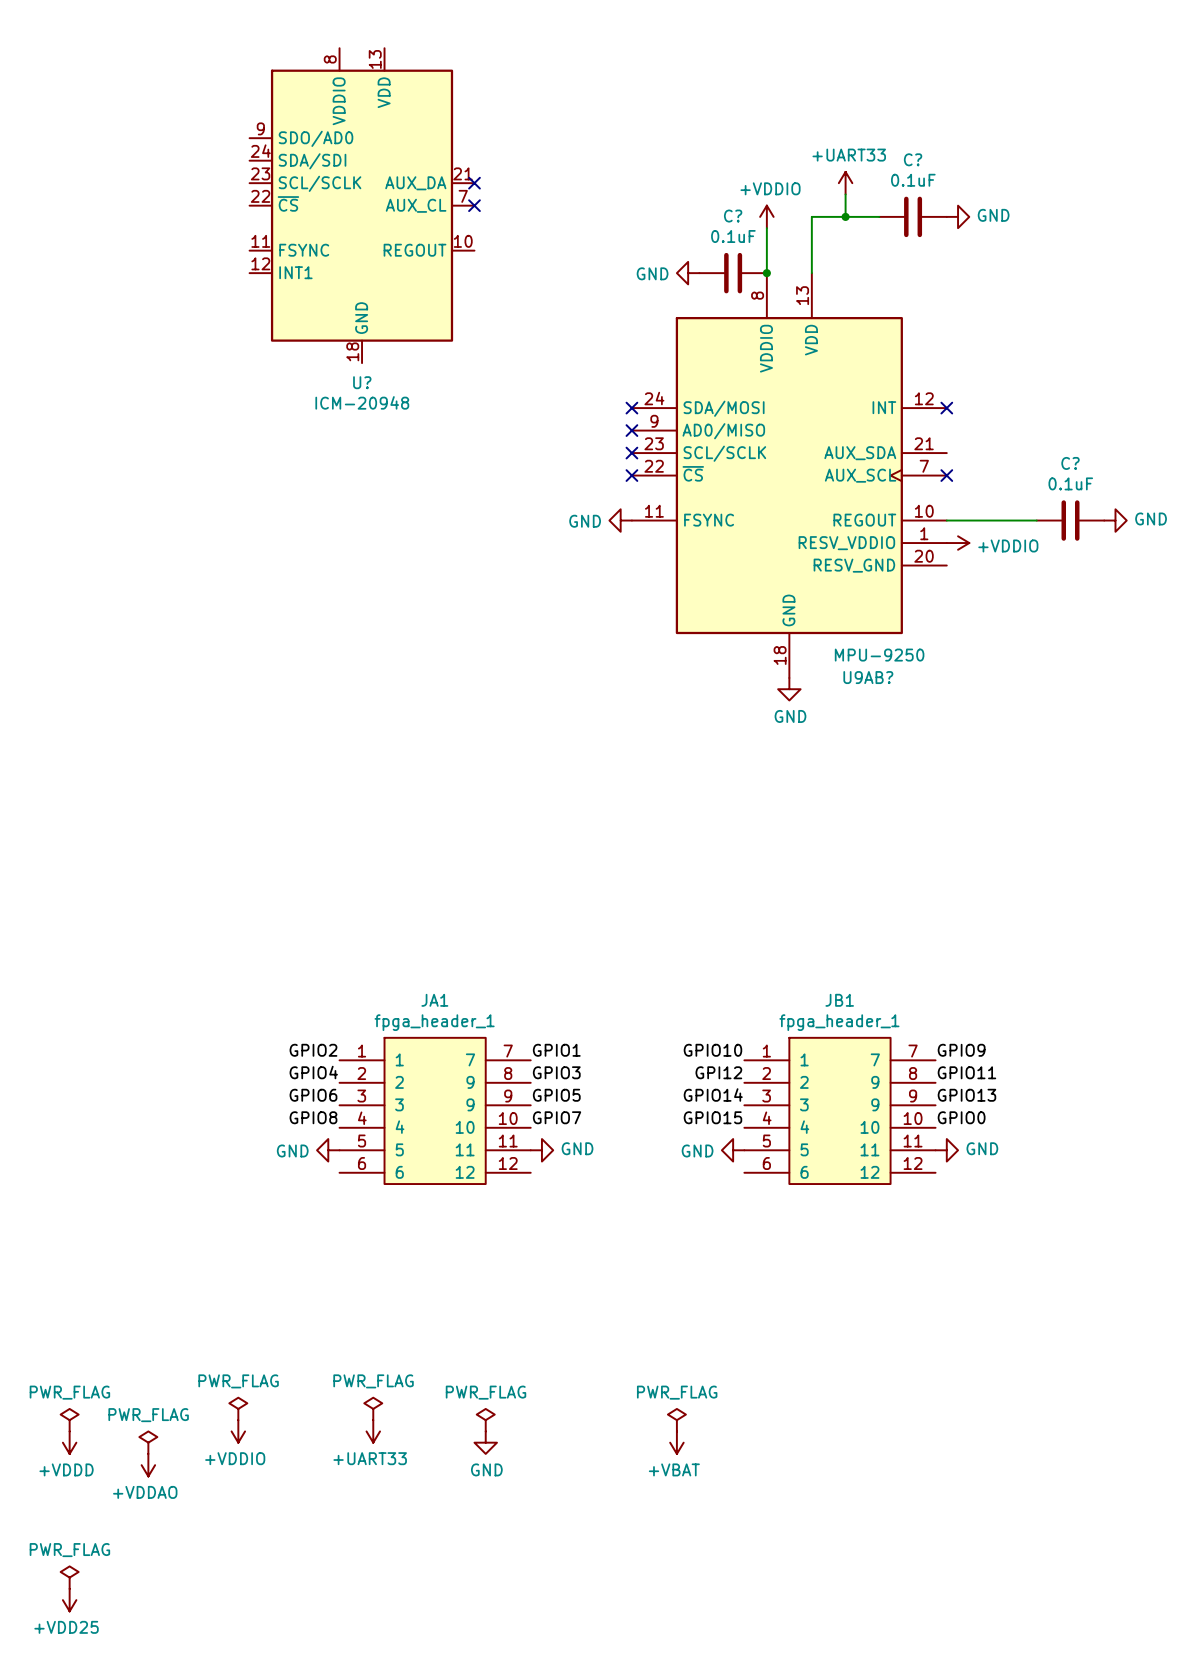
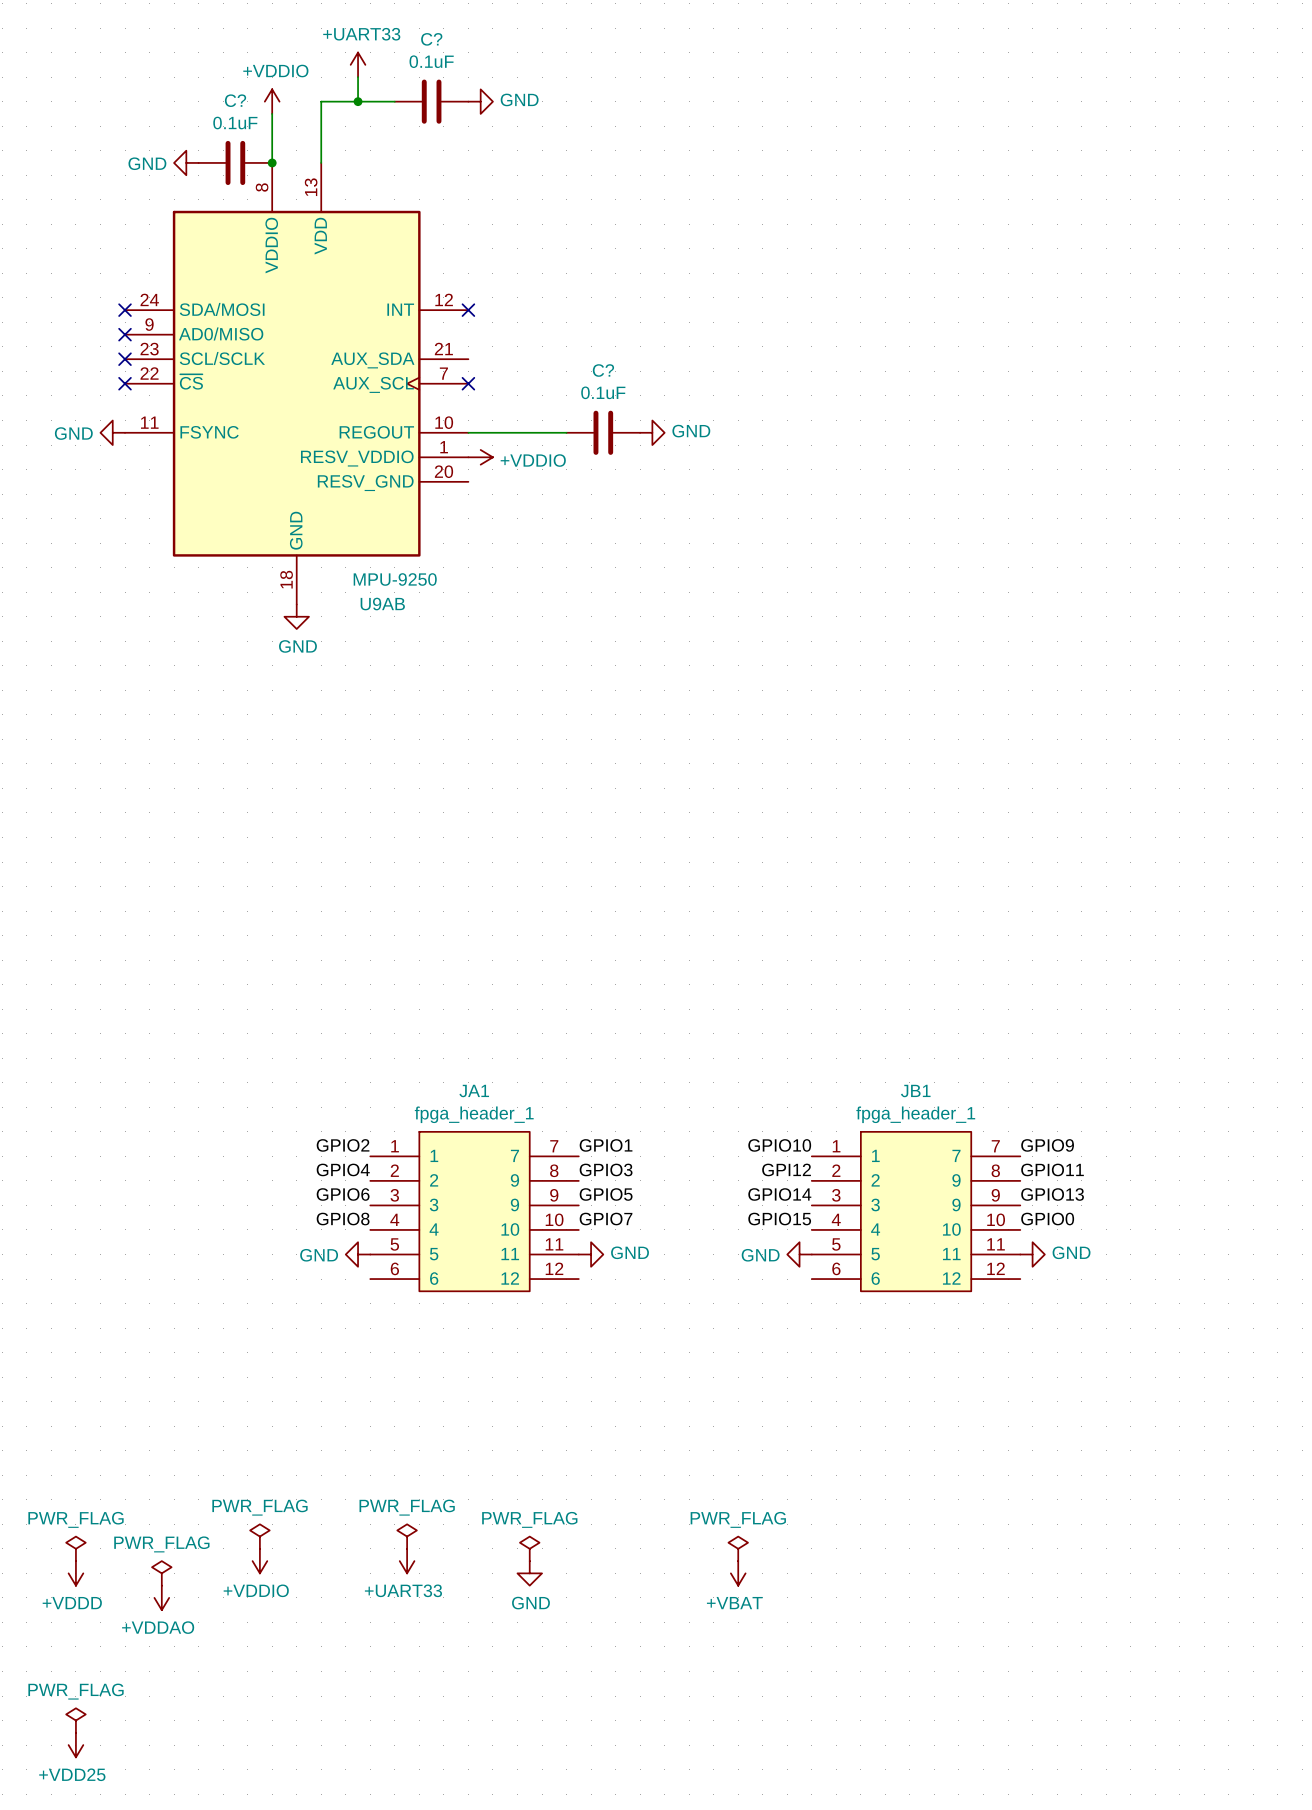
power symbol: none -> +UART33 (358, 64)
power symbol: none -> +VDDIO (272, 101)
junction: none -> (358, 101)
C?: none -> 0.1uF (431, 101)
power symbol: none -> GND (480, 101)
wire: none -> (272, 113) (272, 162)
power symbol: none -> GND (186, 162)
C?: none -> 0.1uF (235, 162)
junction: none -> (272, 162)
no-connect mark: (474, 183) -> none
power symbol: +UART33 (845, 183) -> none
wire: (845, 194) (845, 216) -> none
U?: ICM-20948 (362, 205) -> none
no-connect mark: (474, 205) -> none
power symbol: +VDDIO (766, 216) -> none
junction: (845, 216) -> none
wire: (879, 216) (811, 216) (811, 273) -> none
C?: 0.1uF (913, 216) -> none
power symbol: GND (958, 216) -> none
wire: (766, 228) (766, 273) -> none
power symbol: GND (688, 273) -> none
C?: 0.1uF (733, 273) -> none
junction: (766, 273) -> none
no-connect mark: none -> (125, 310)
no-connect mark: none -> (468, 310)
no-connect mark: none -> (125, 334)
no-connect mark: none -> (125, 359)
no-connect mark: none -> (125, 383)
U9AB: none -> MPU-9250 (296, 383)
no-connect mark: none -> (468, 383)
power symbol: none -> GND (112, 432)
wire: none -> (468, 432) (566, 432)
C?: none -> 0.1uF (603, 432)
power symbol: none -> GND (652, 432)
no-connect mark: (631, 408) -> none
no-connect mark: (946, 408) -> none
power symbol: none -> +VDDIO (480, 457)
no-connect mark: (631, 430) -> none
no-connect mark: (631, 453) -> none
no-connect mark: (631, 475) -> none
U9AB?: MPU-9250 (789, 475) -> none
no-connect mark: (946, 475) -> none
power symbol: GND (620, 520) -> none
wire: (946, 520) (1036, 520) -> none
C?: 0.1uF (1070, 520) -> none
power symbol: GND (1115, 520) -> none
power symbol: +VDDIO (958, 543) -> none
power symbol: none -> GND (296, 616)
power symbol: GND (789, 689) -> none

